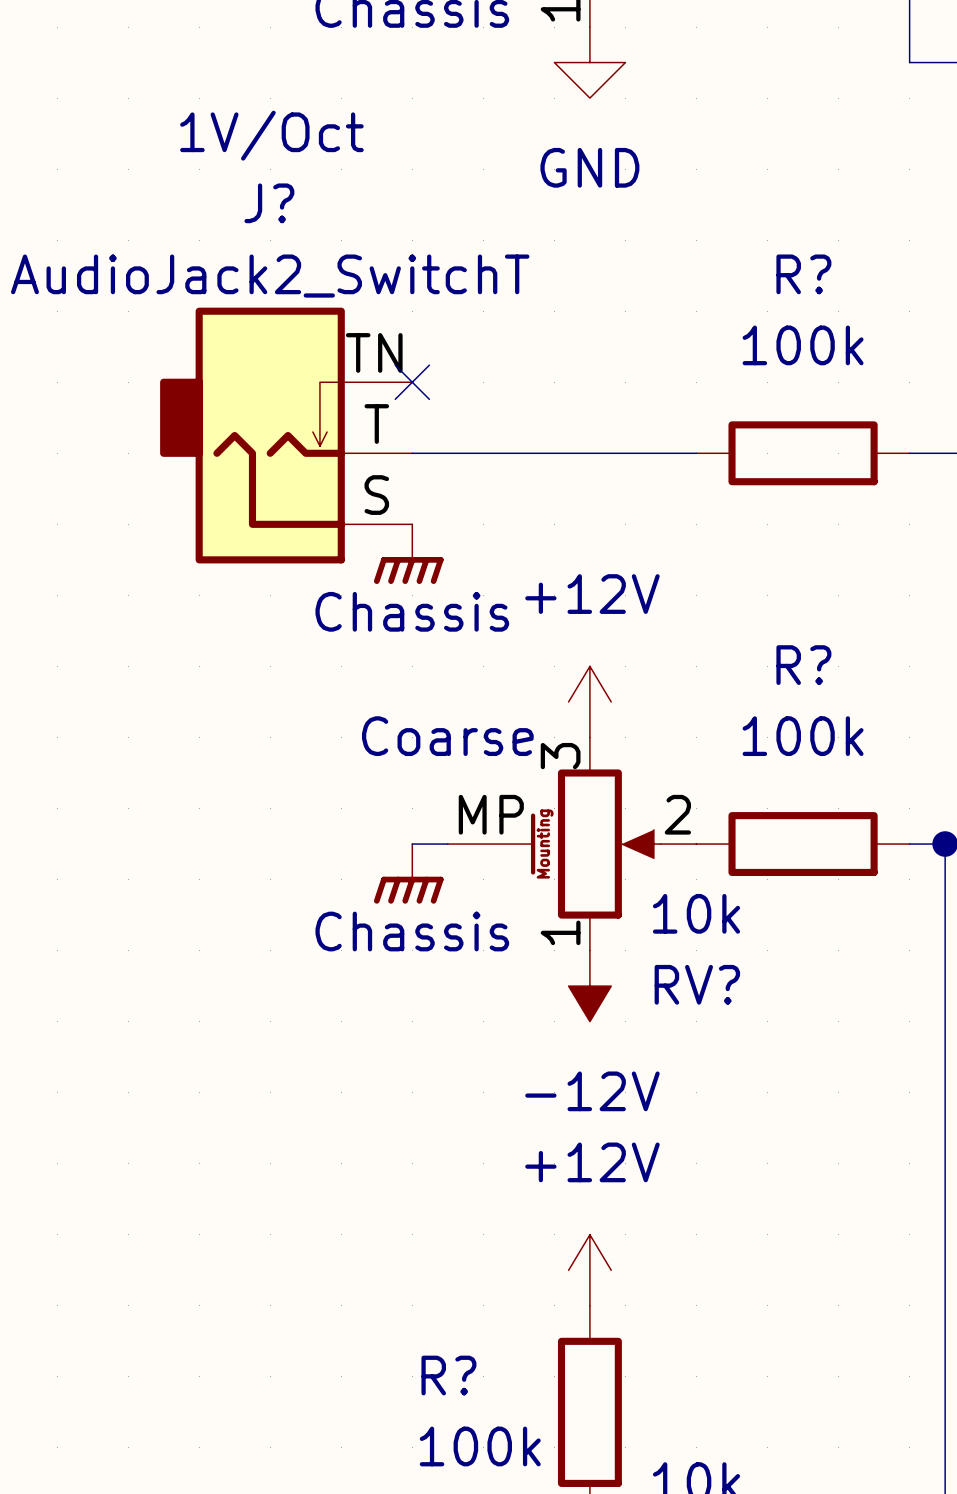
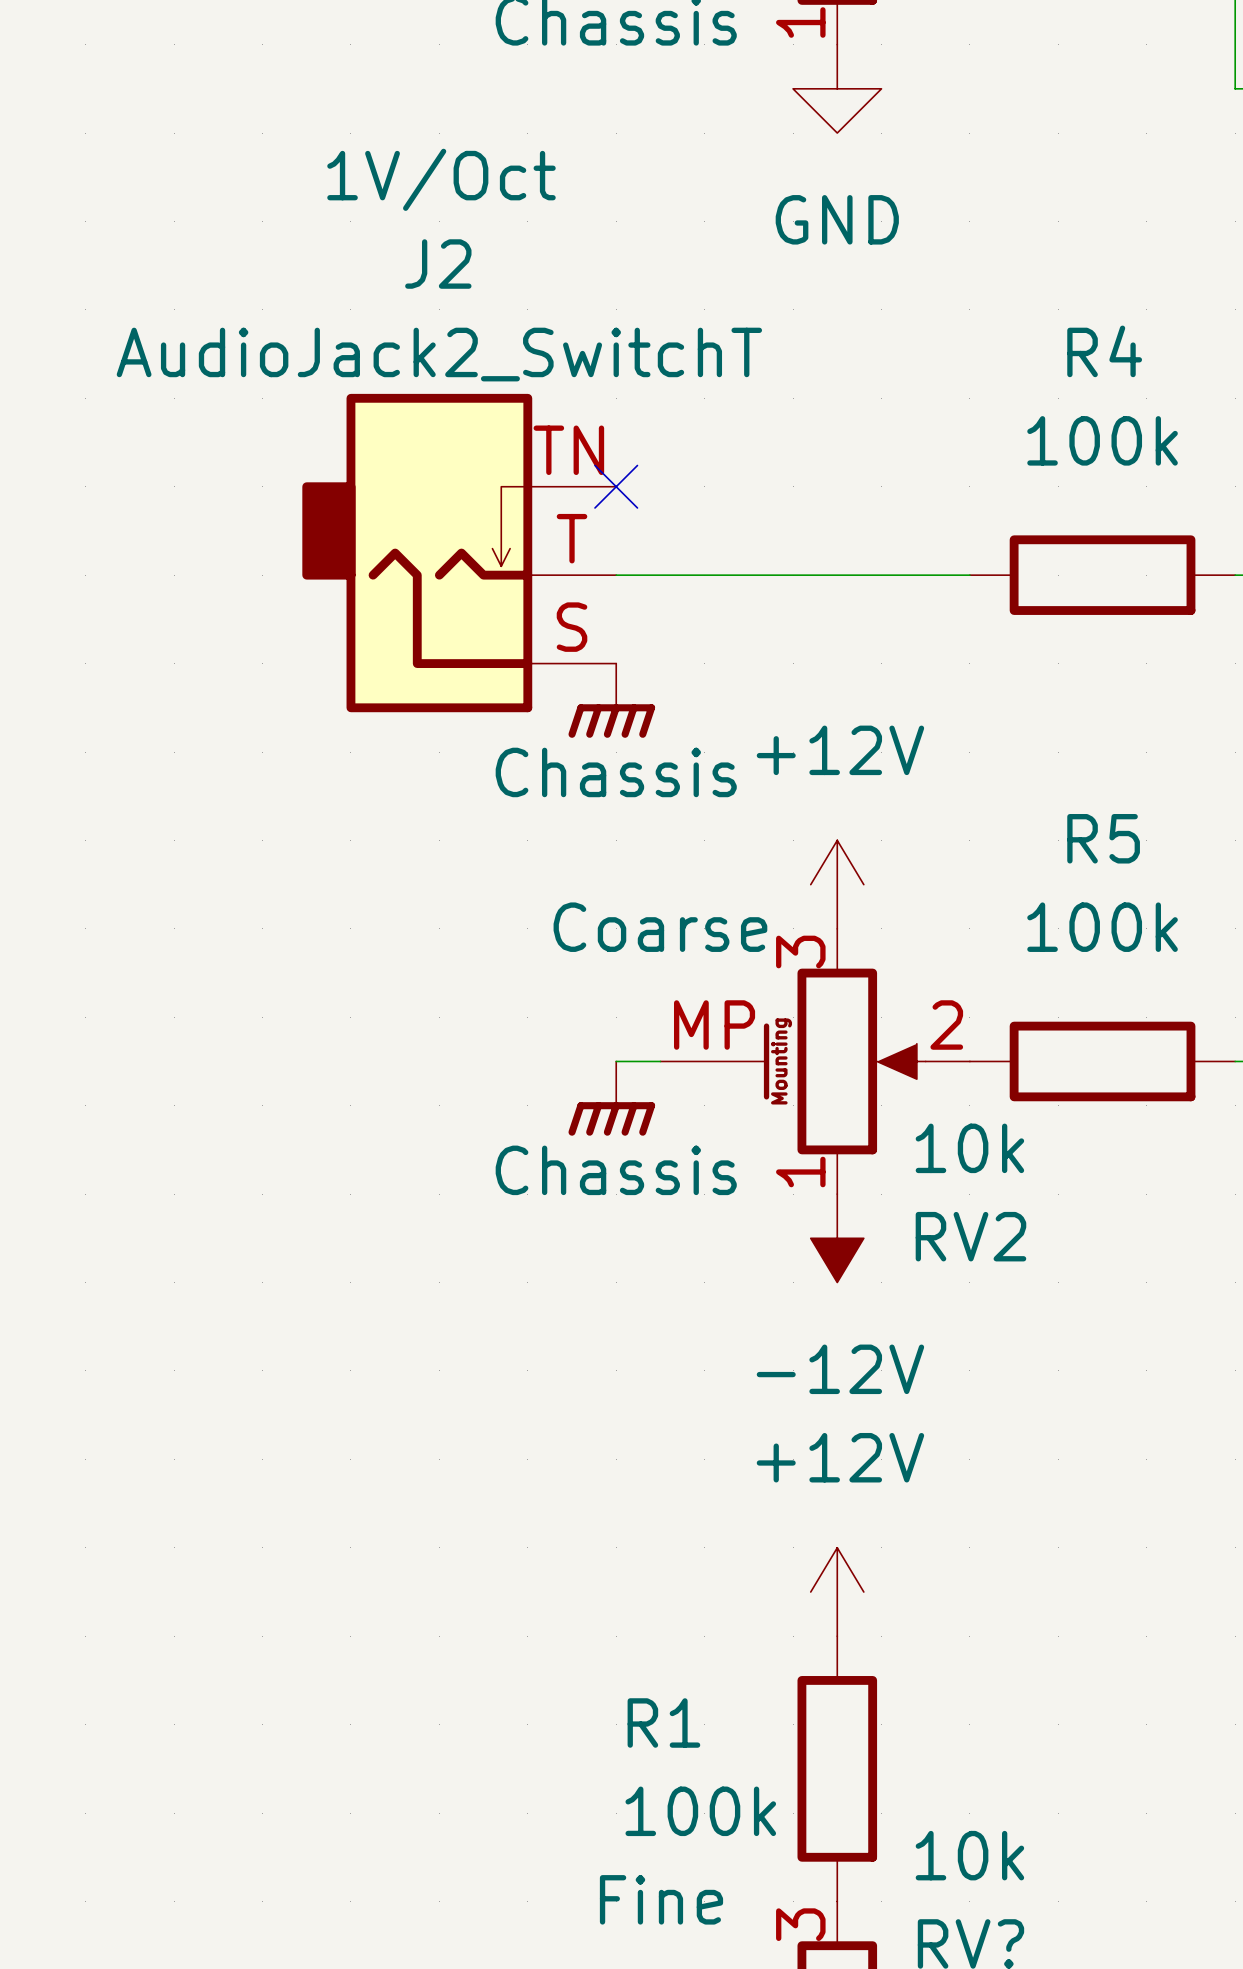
J? name: J? (269, 203) -> J2 (438, 264)
R? name: R? (803, 274) -> R4 (1104, 351)
R? name: R? (803, 665) -> R5 (1103, 838)
RV? name: RV? (697, 984) -> RV2 (970, 1236)
R? name: R? (448, 1375) -> R1 (663, 1722)

